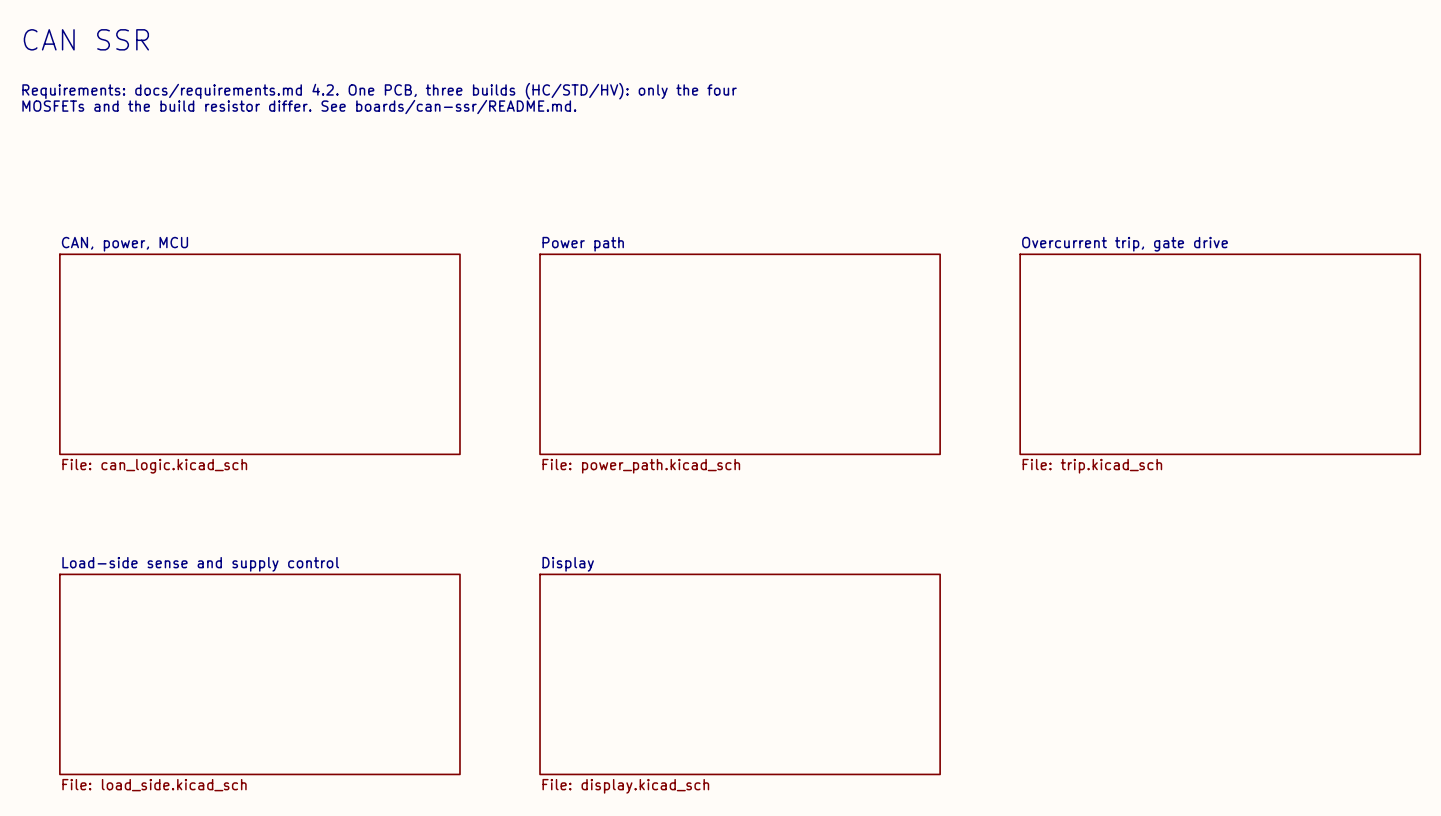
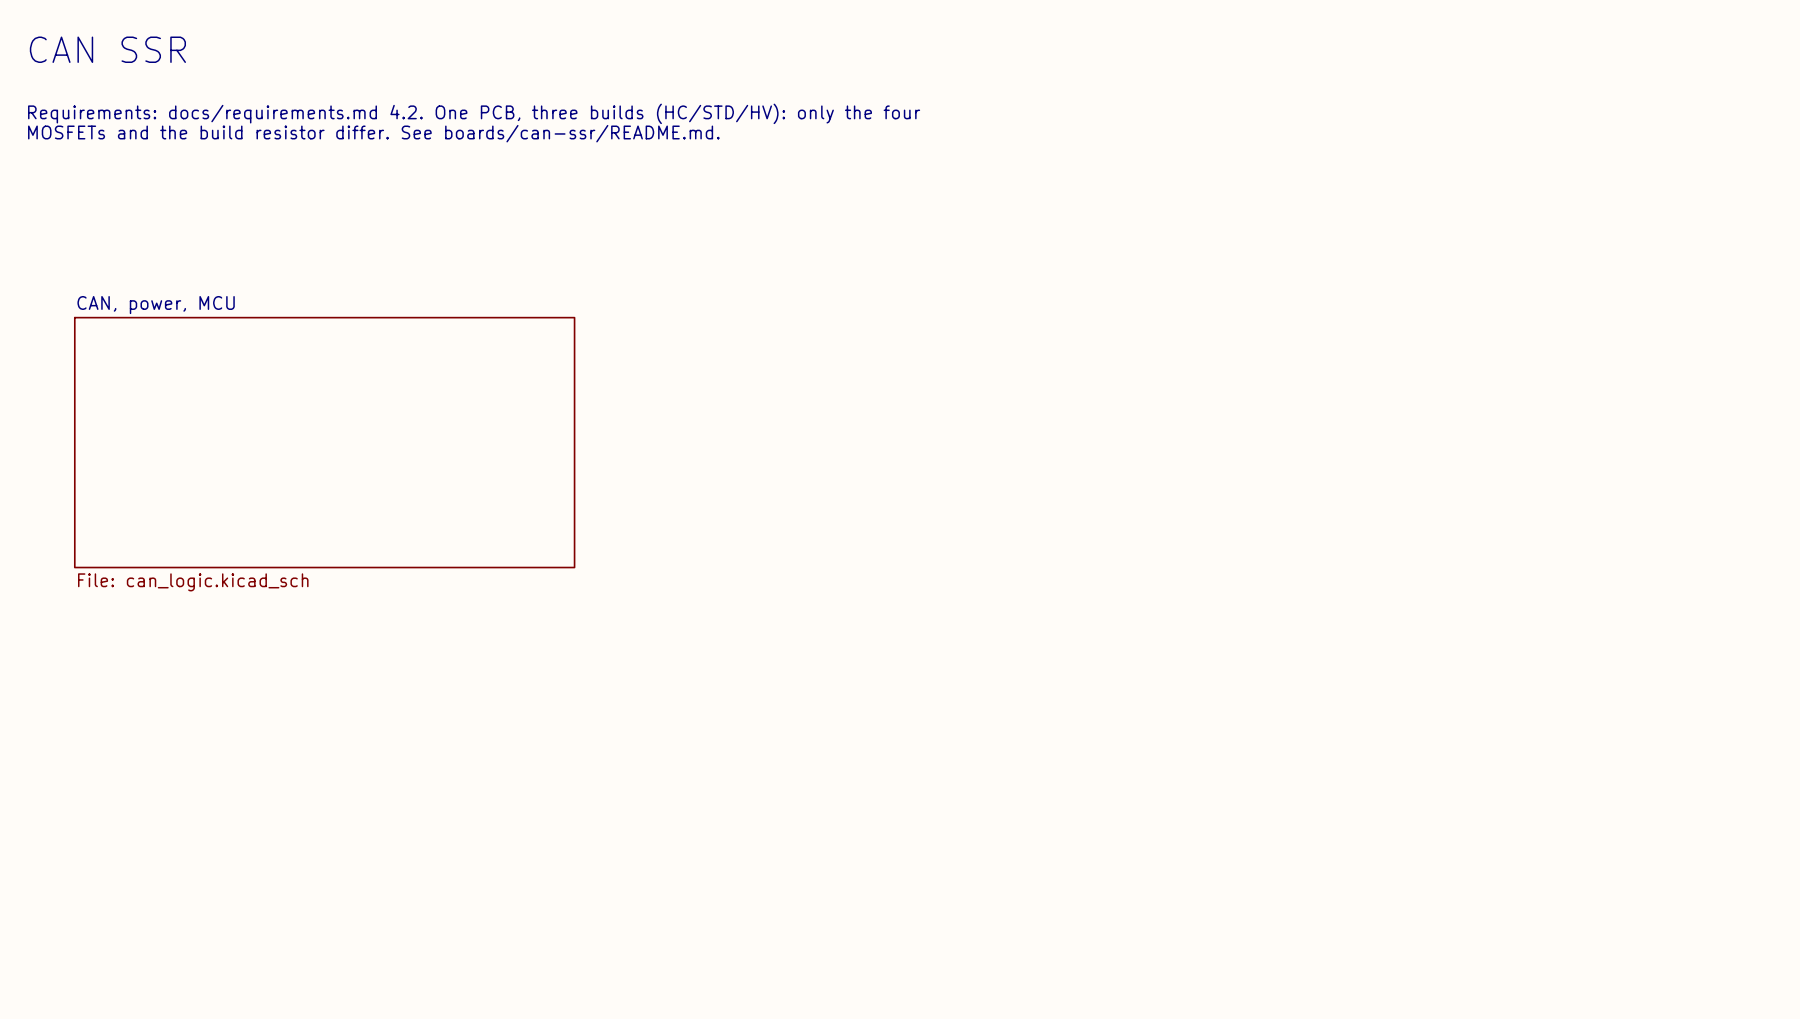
sheet Power path: File: power_path.kicad_sch (740, 354) -> none
sheet Overcurrent trip, gate drive: File: trip.kicad_sch (1220, 354) -> none
sheet Load-side sense and supply control: File: load_side.kicad_sch (259, 674) -> none
sheet Display: File: display.kicad_sch (740, 674) -> none

